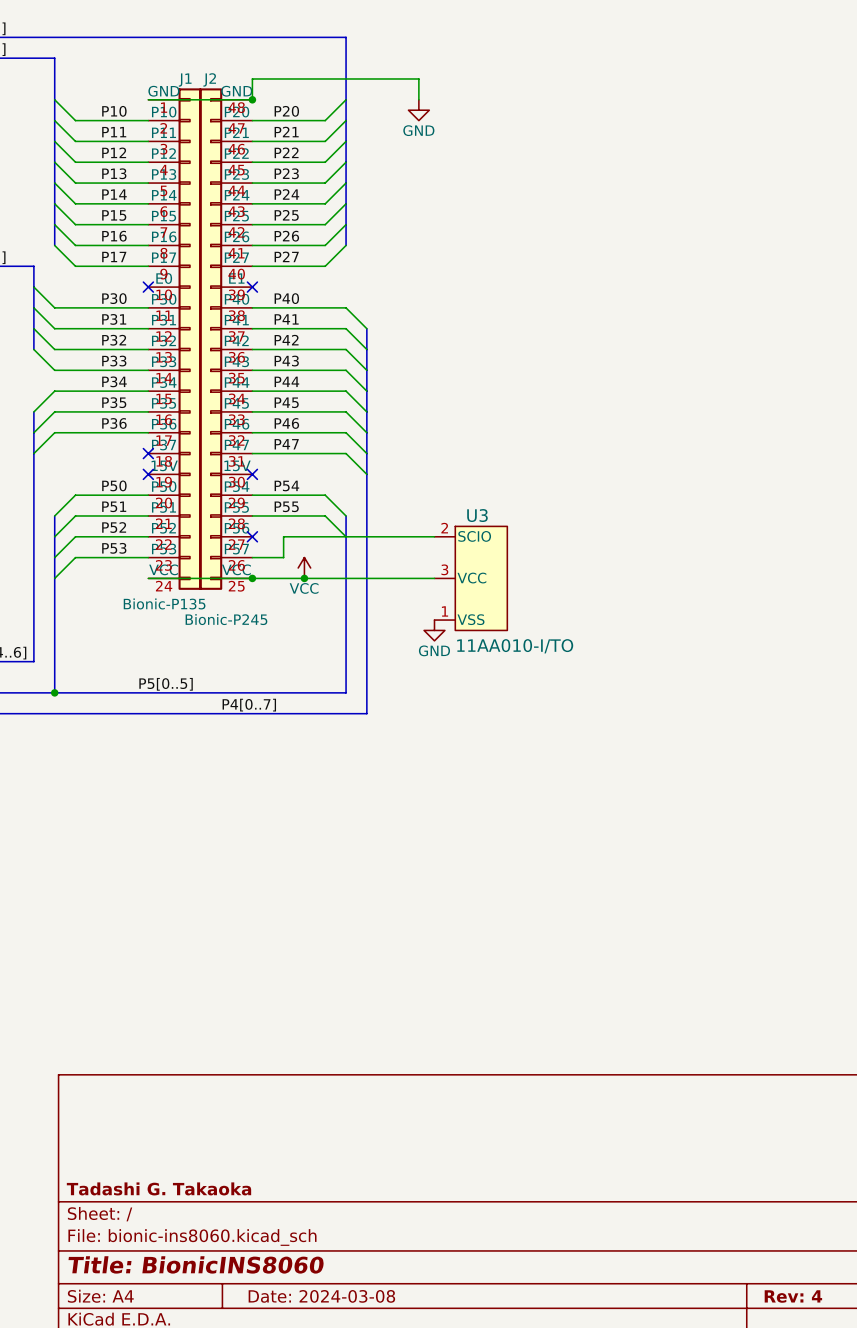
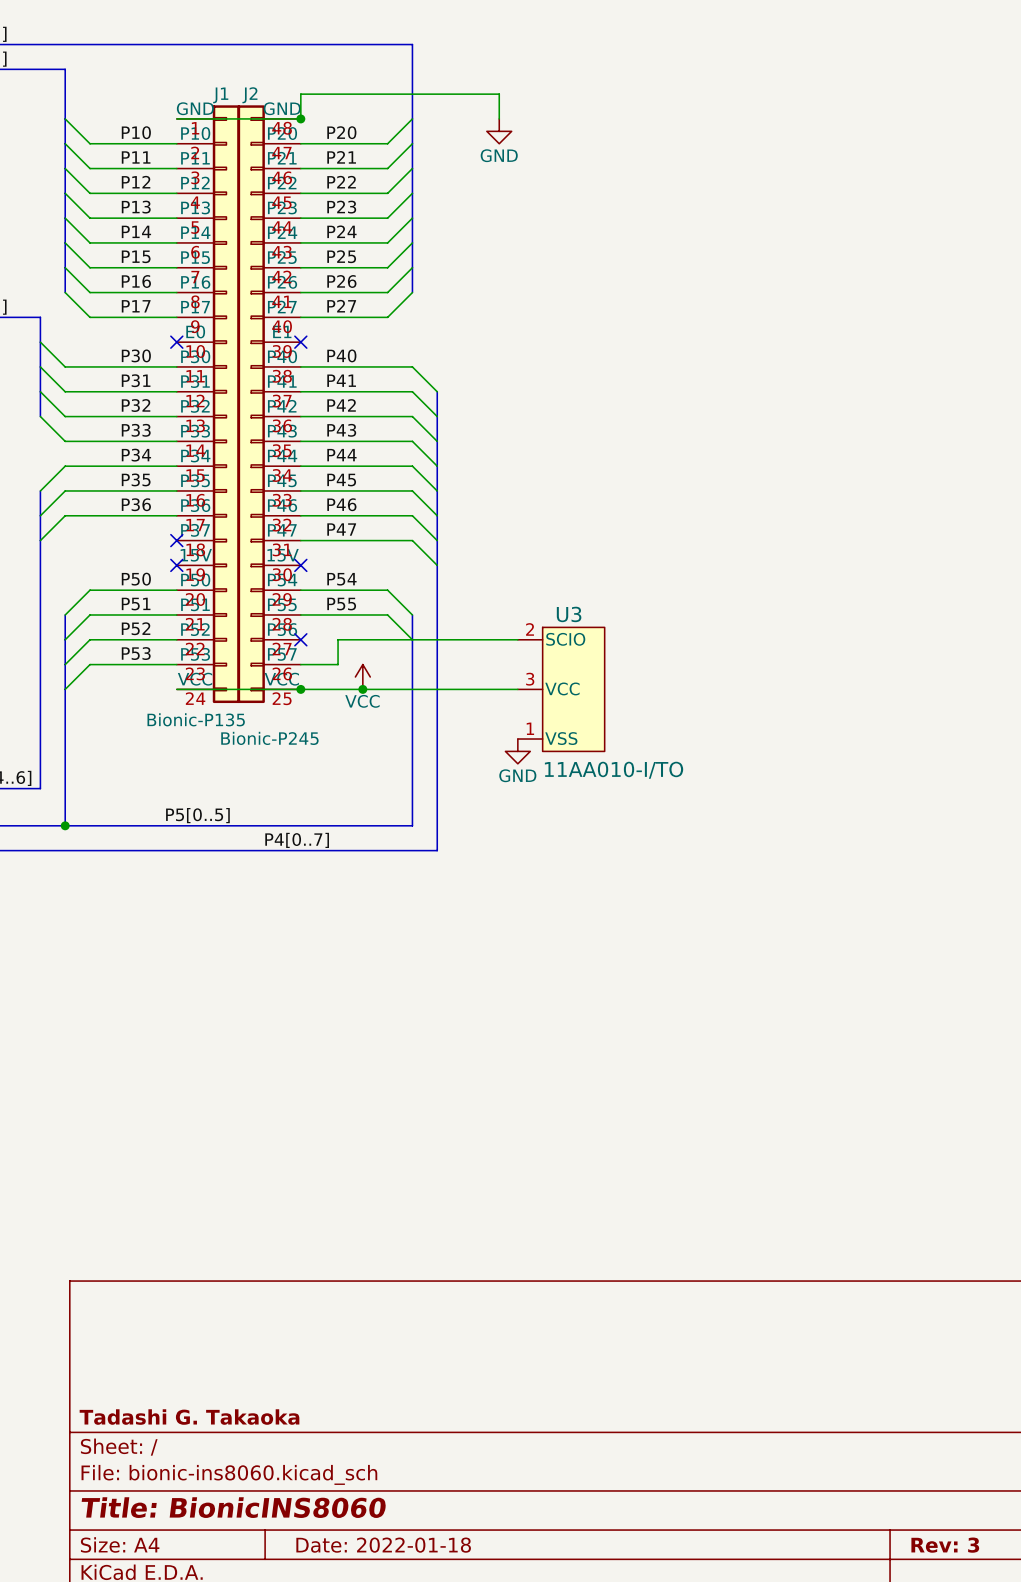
title block: Date: 2024-03-08 (321, 1296) -> Date: 2022-01-18 (383, 1545)
title block: Rev: 4 (793, 1296) -> Rev: 3 (945, 1545)

